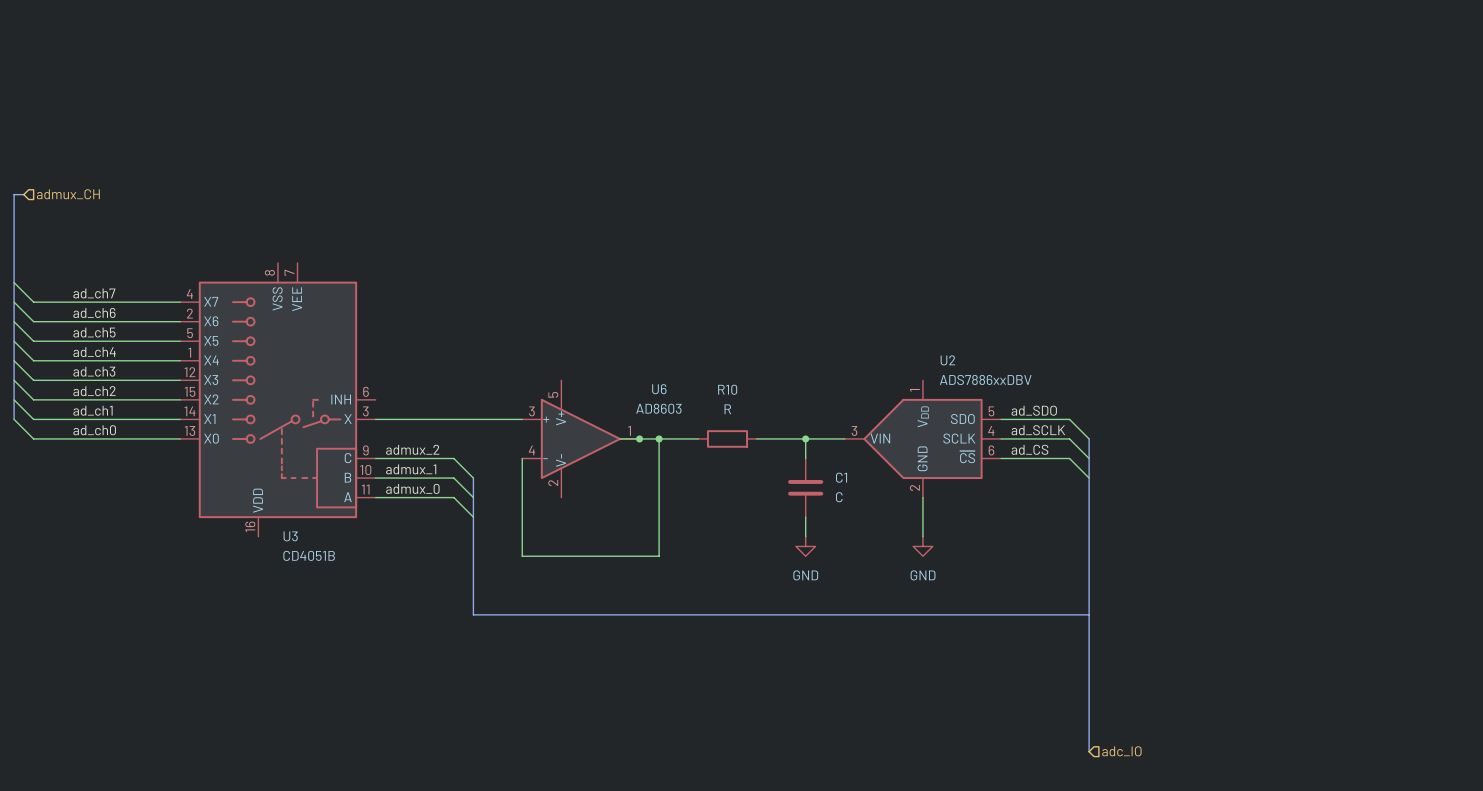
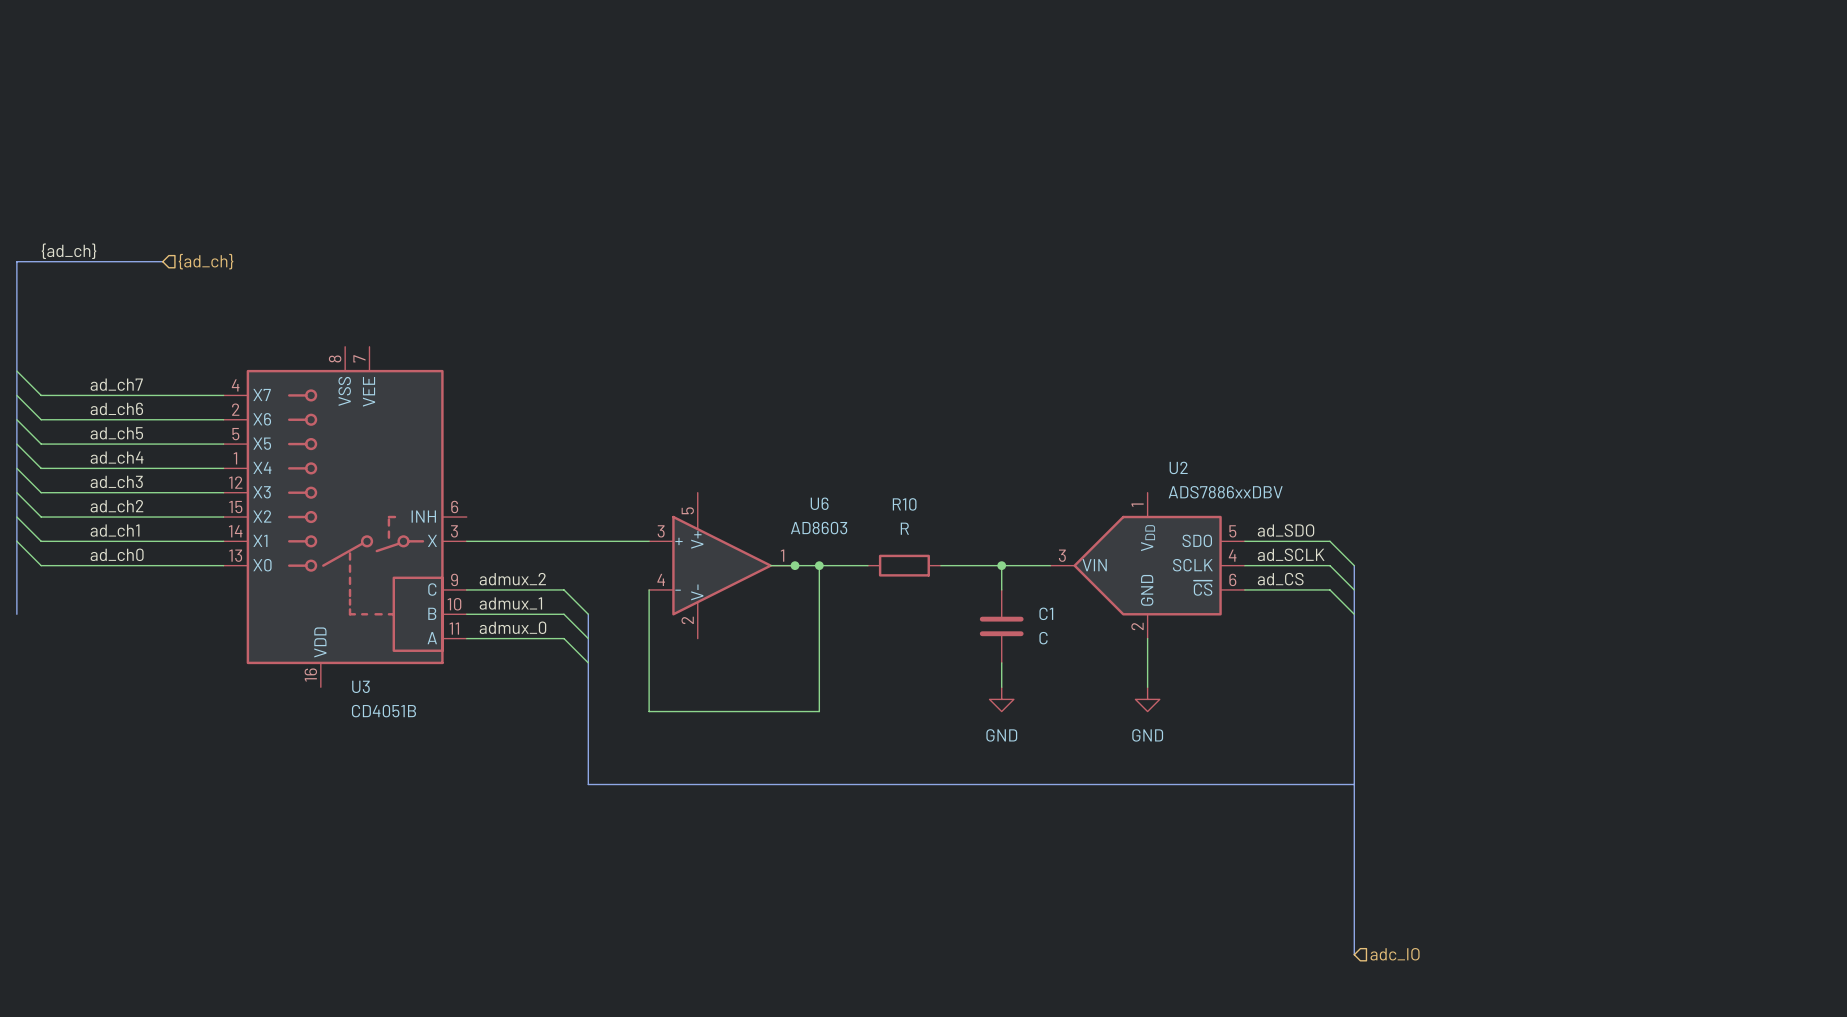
label: none -> {ad_ch} (69, 251)
bus: none -> (29, 261) (162, 261)
hierarchical label: admux_CH (68, 194) -> none
hierarchical label: none -> {ad_ch} (206, 261)
bus: none -> (16, 541) (16, 614)

